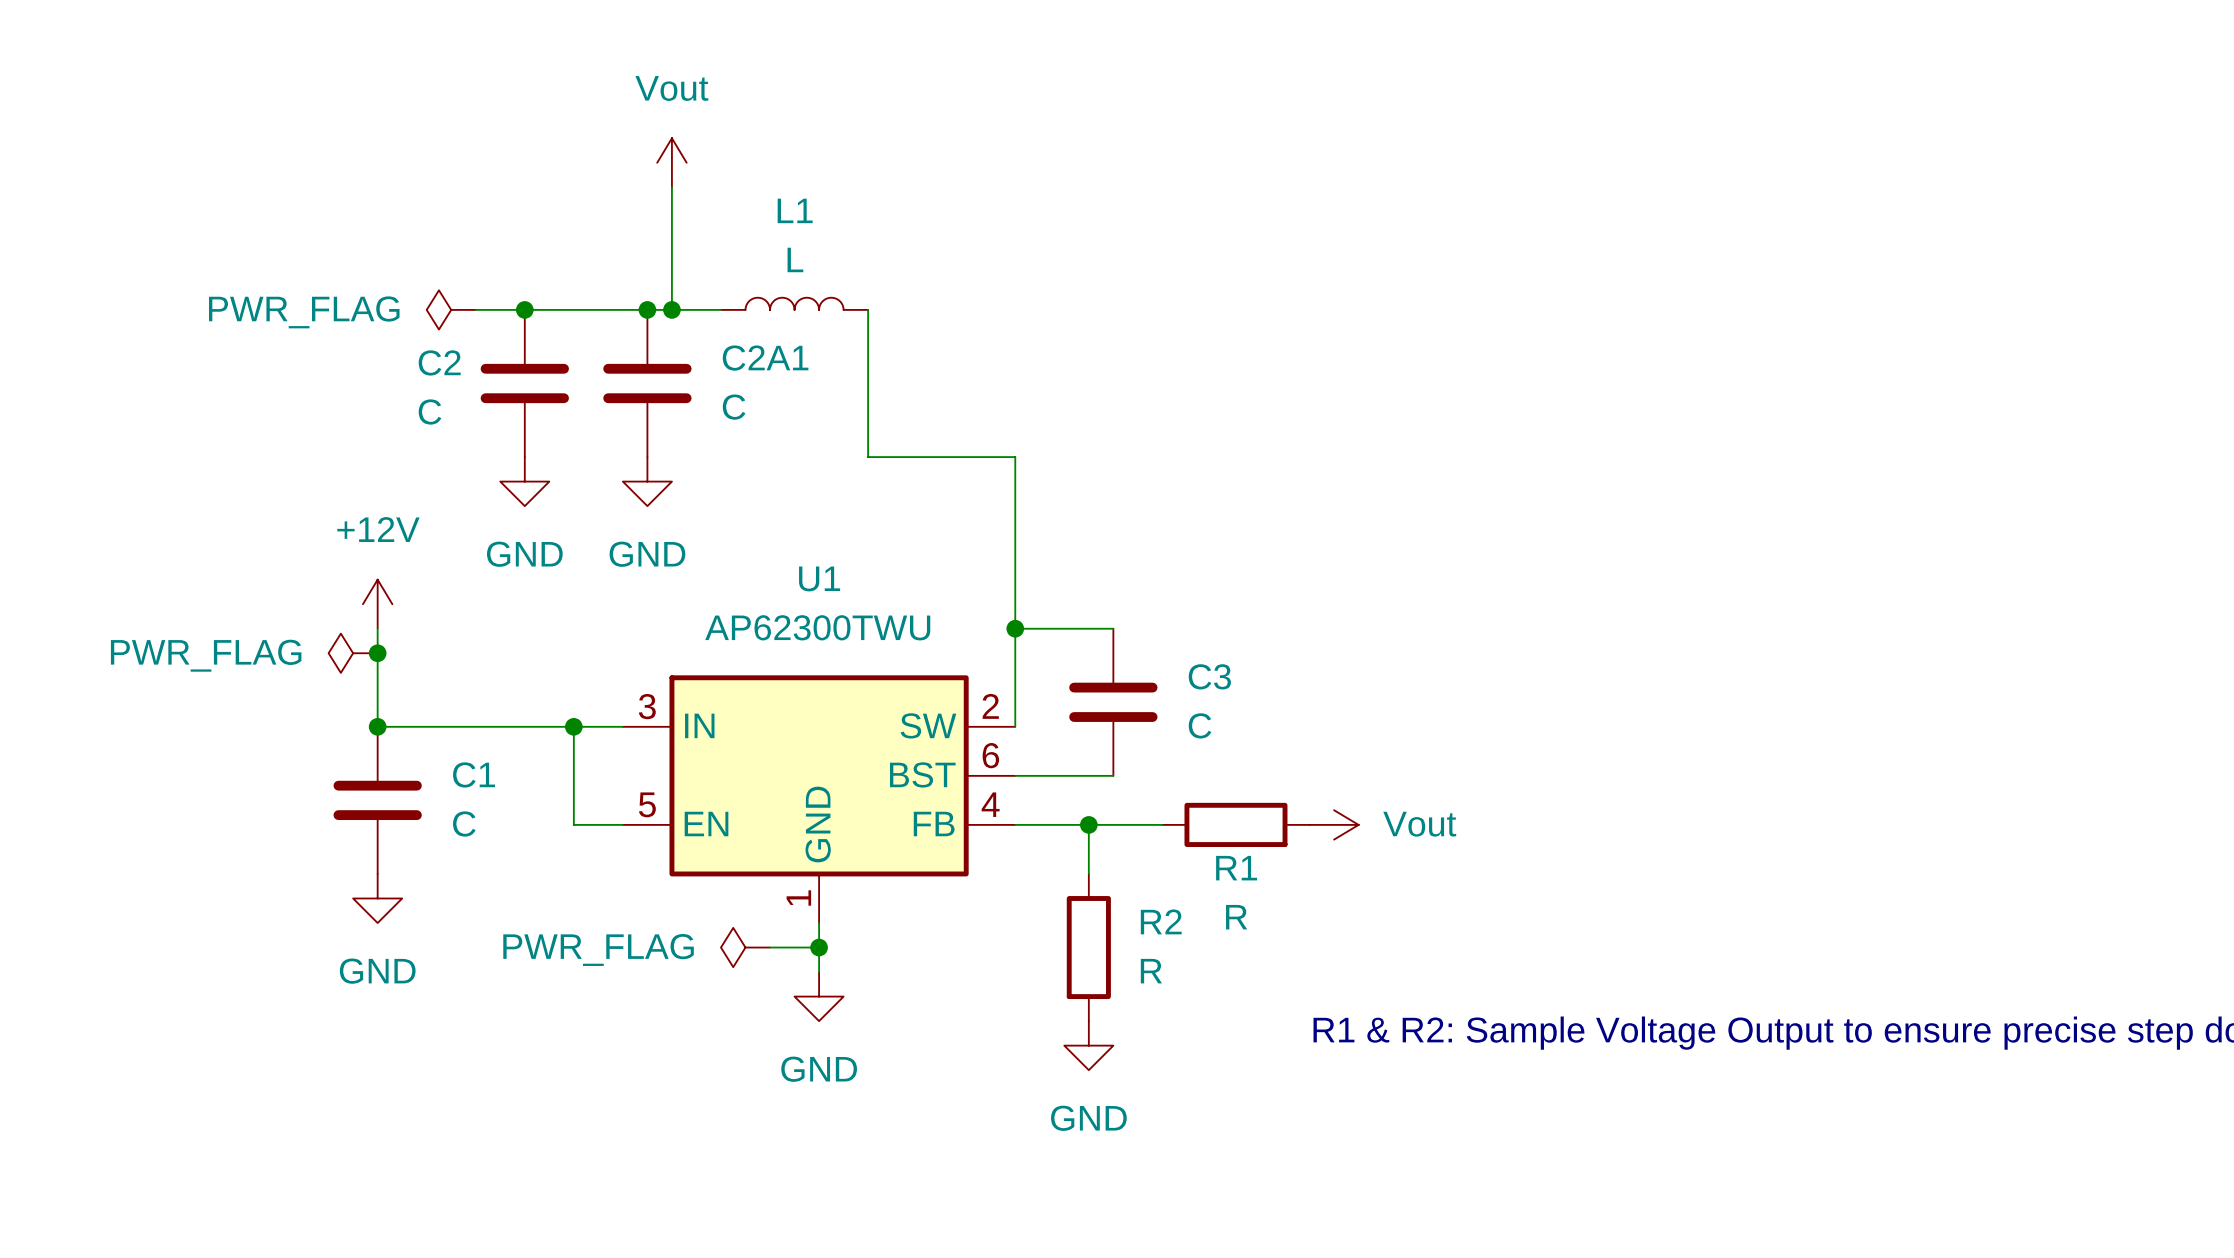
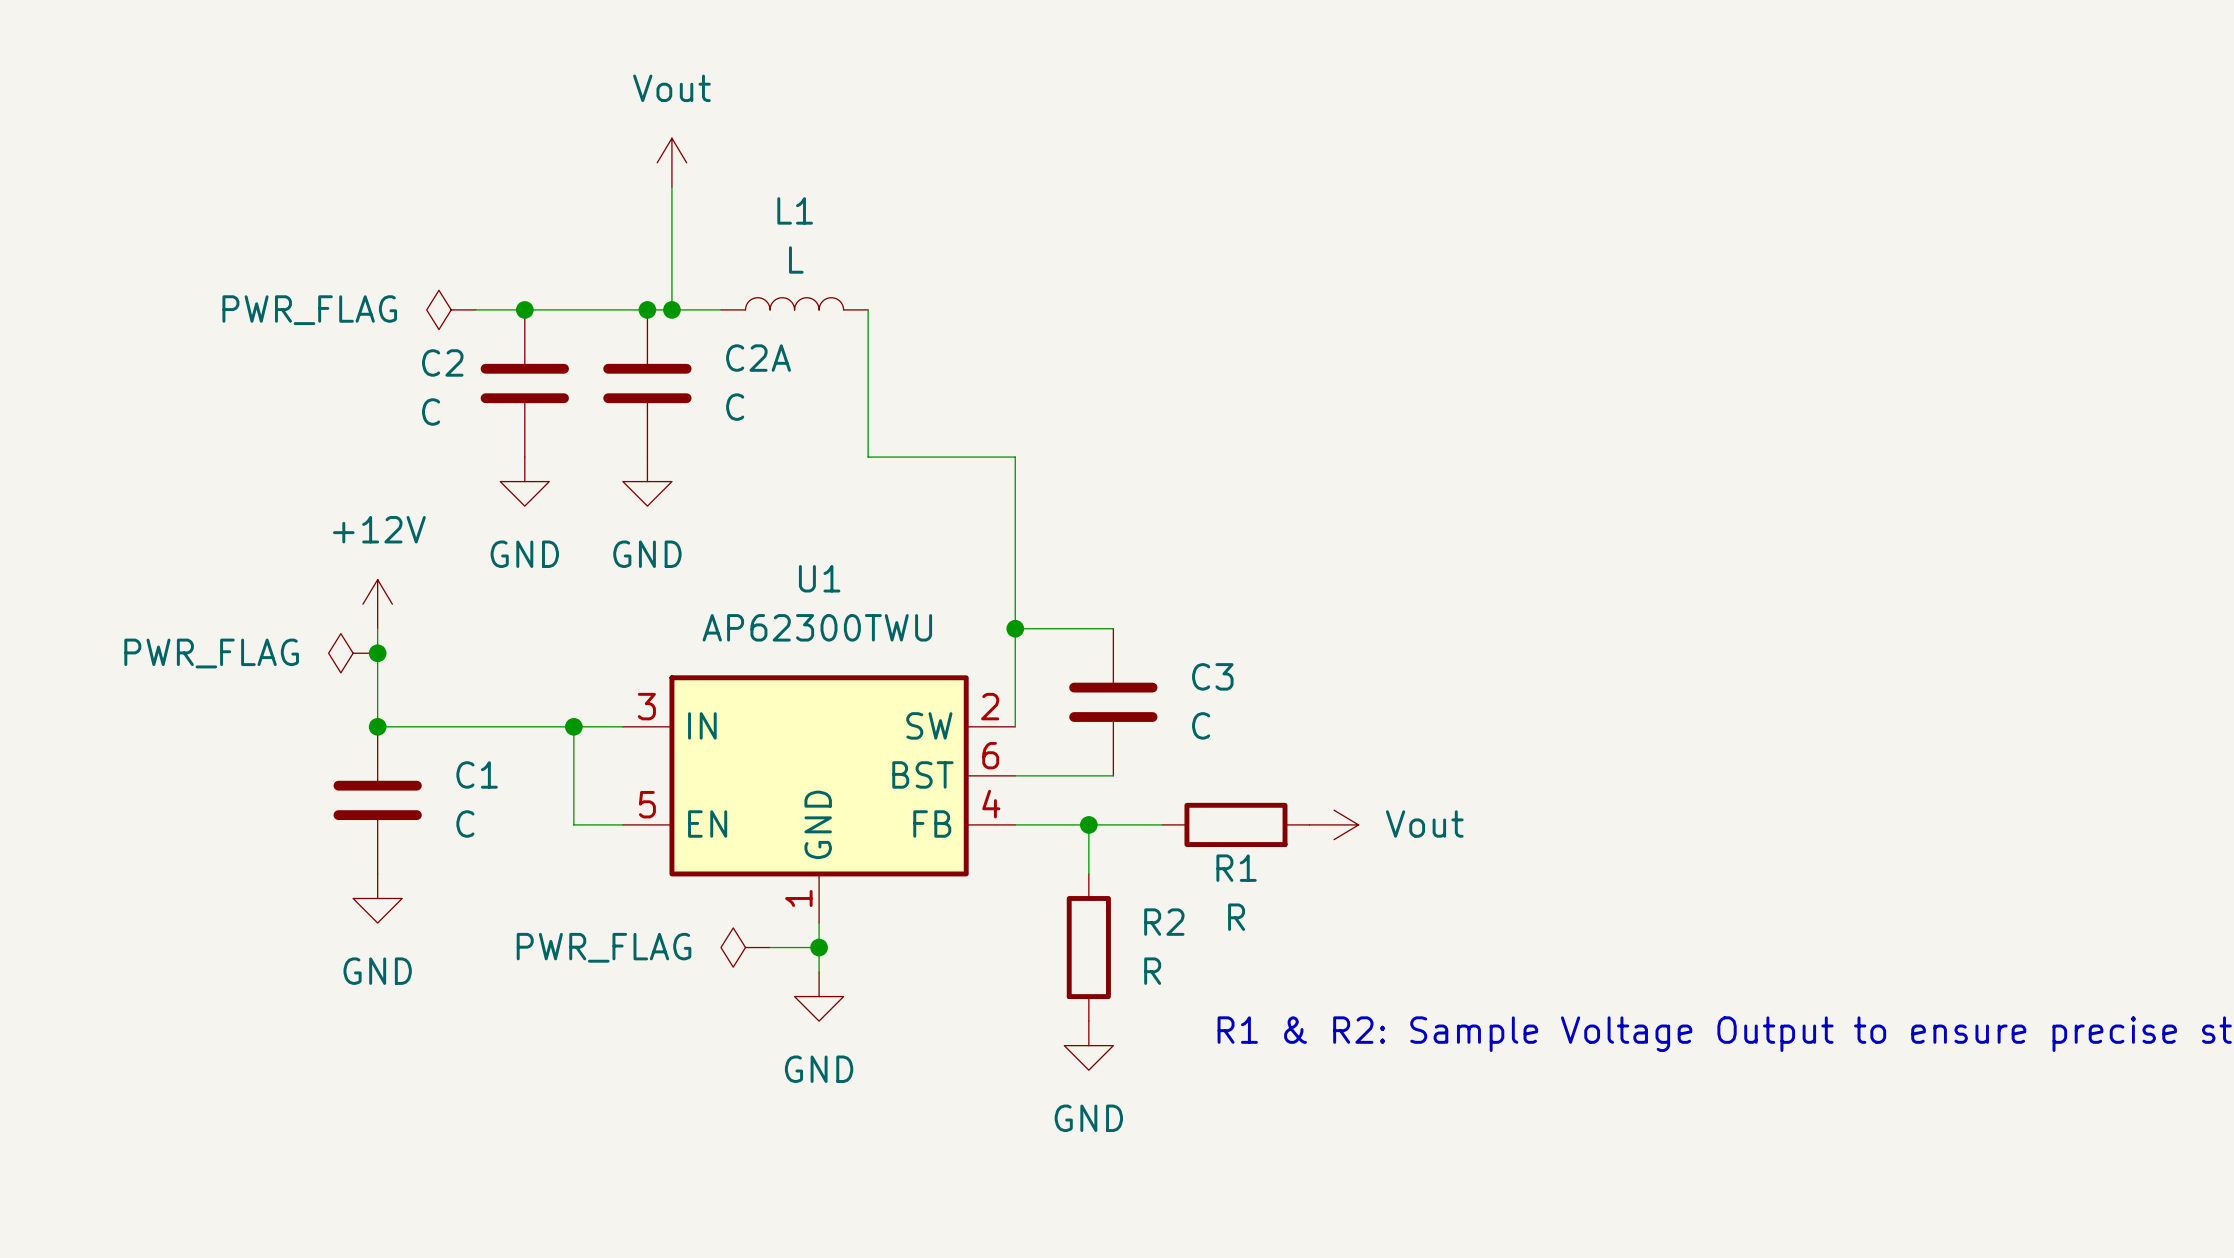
C2A1 name: C2A1 (765, 358) -> C2A (758, 358)

